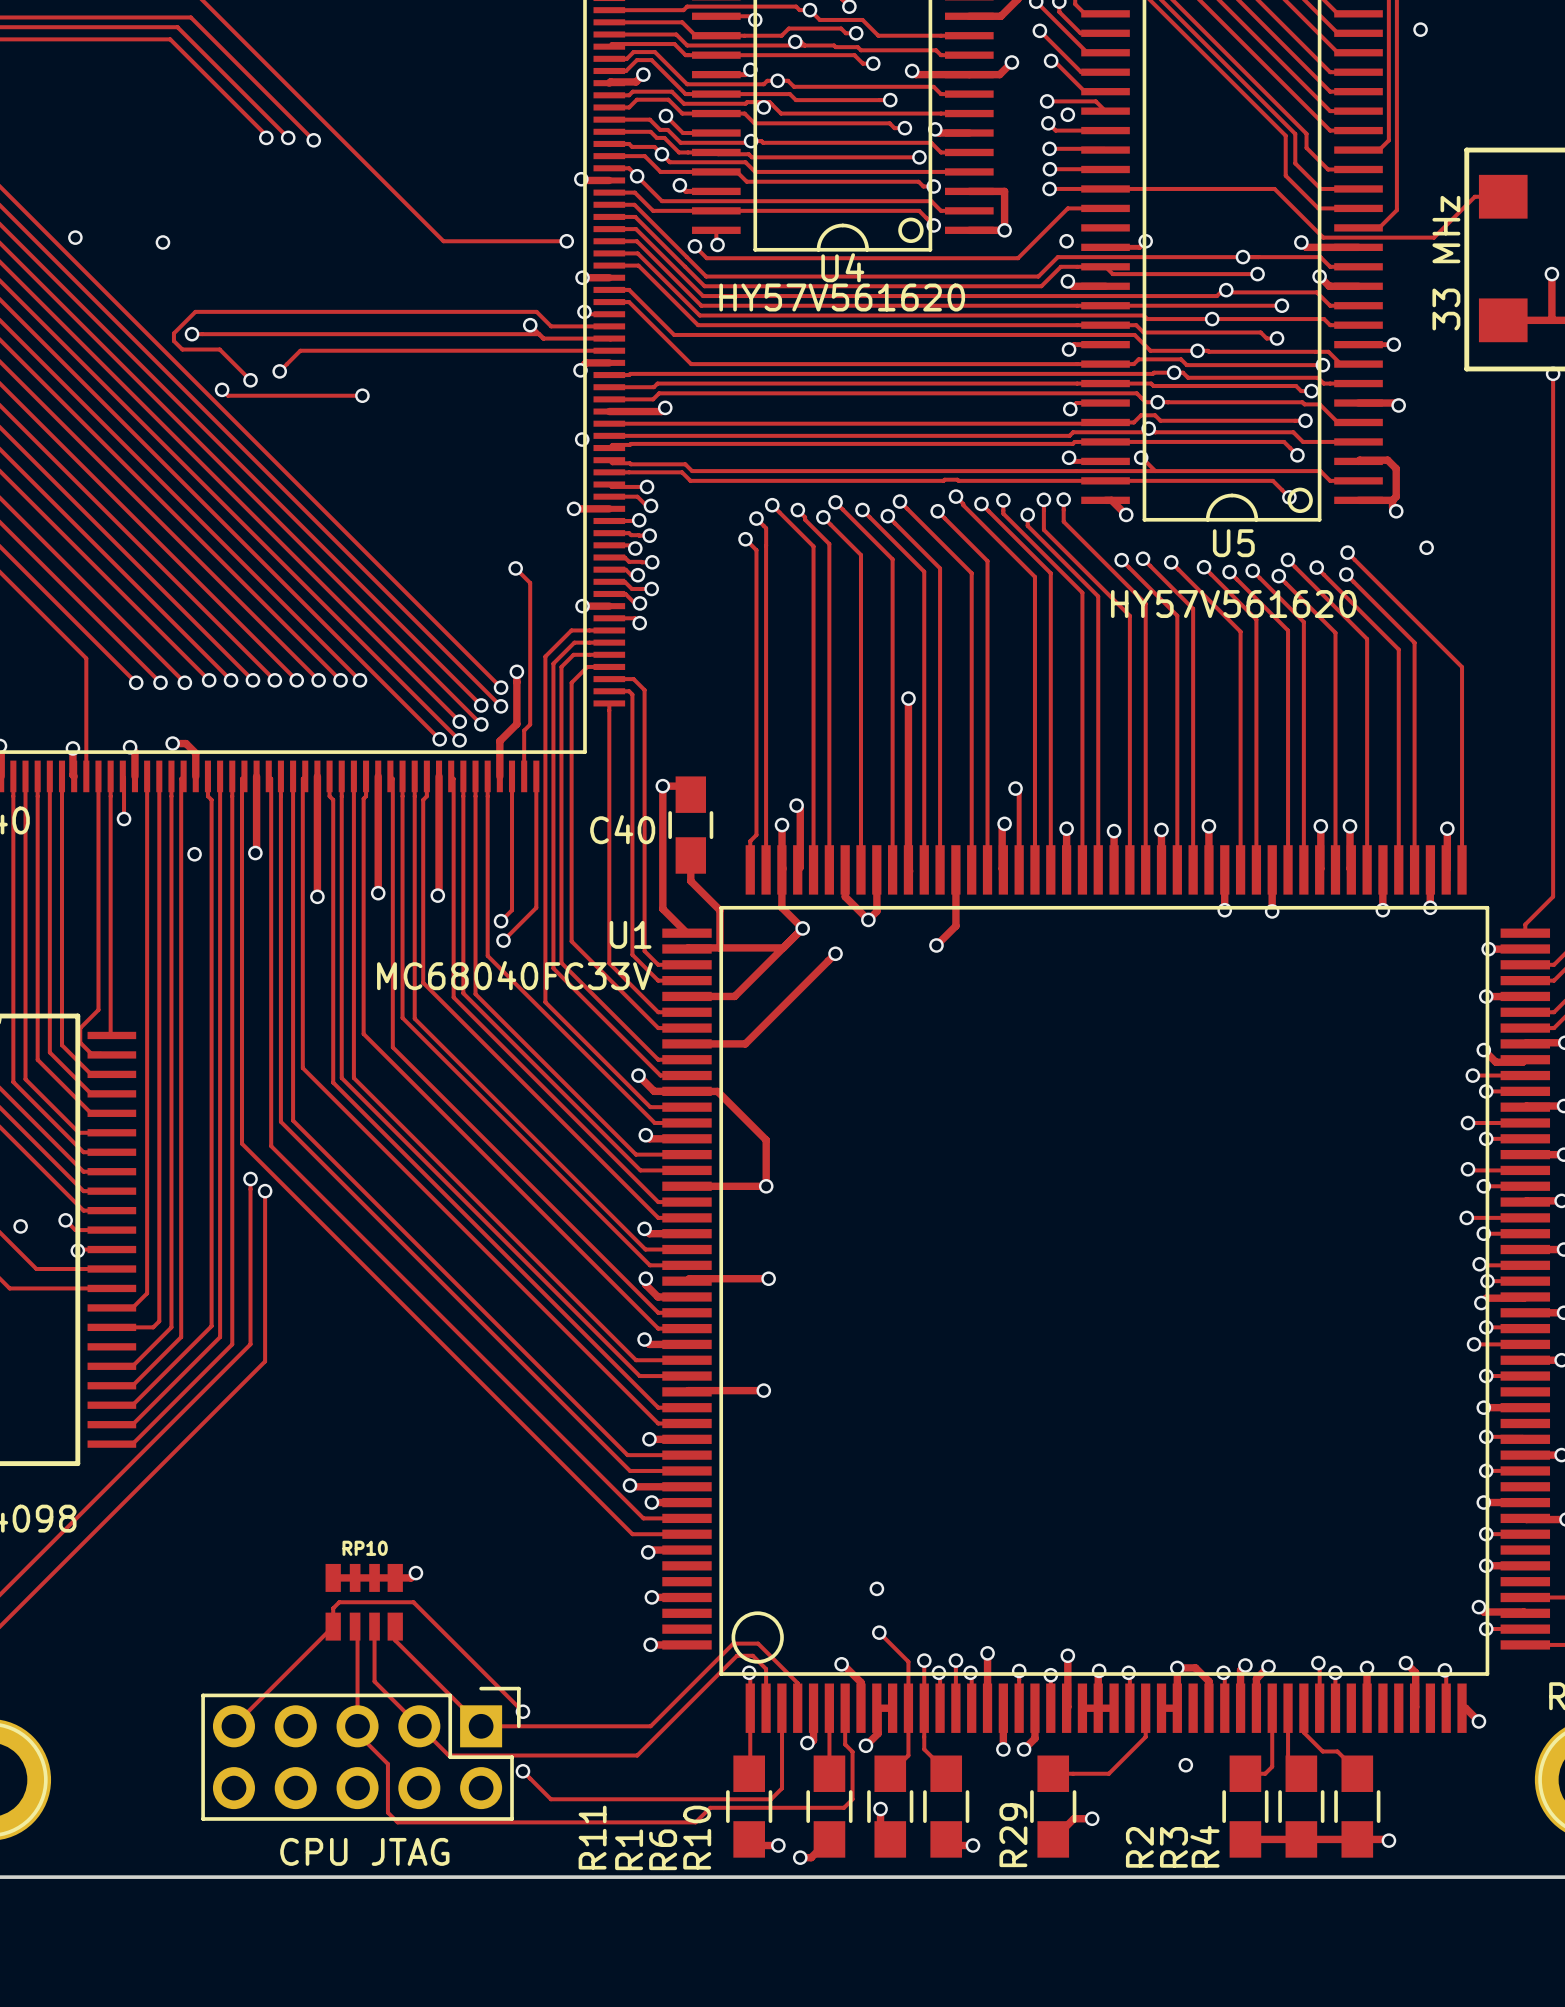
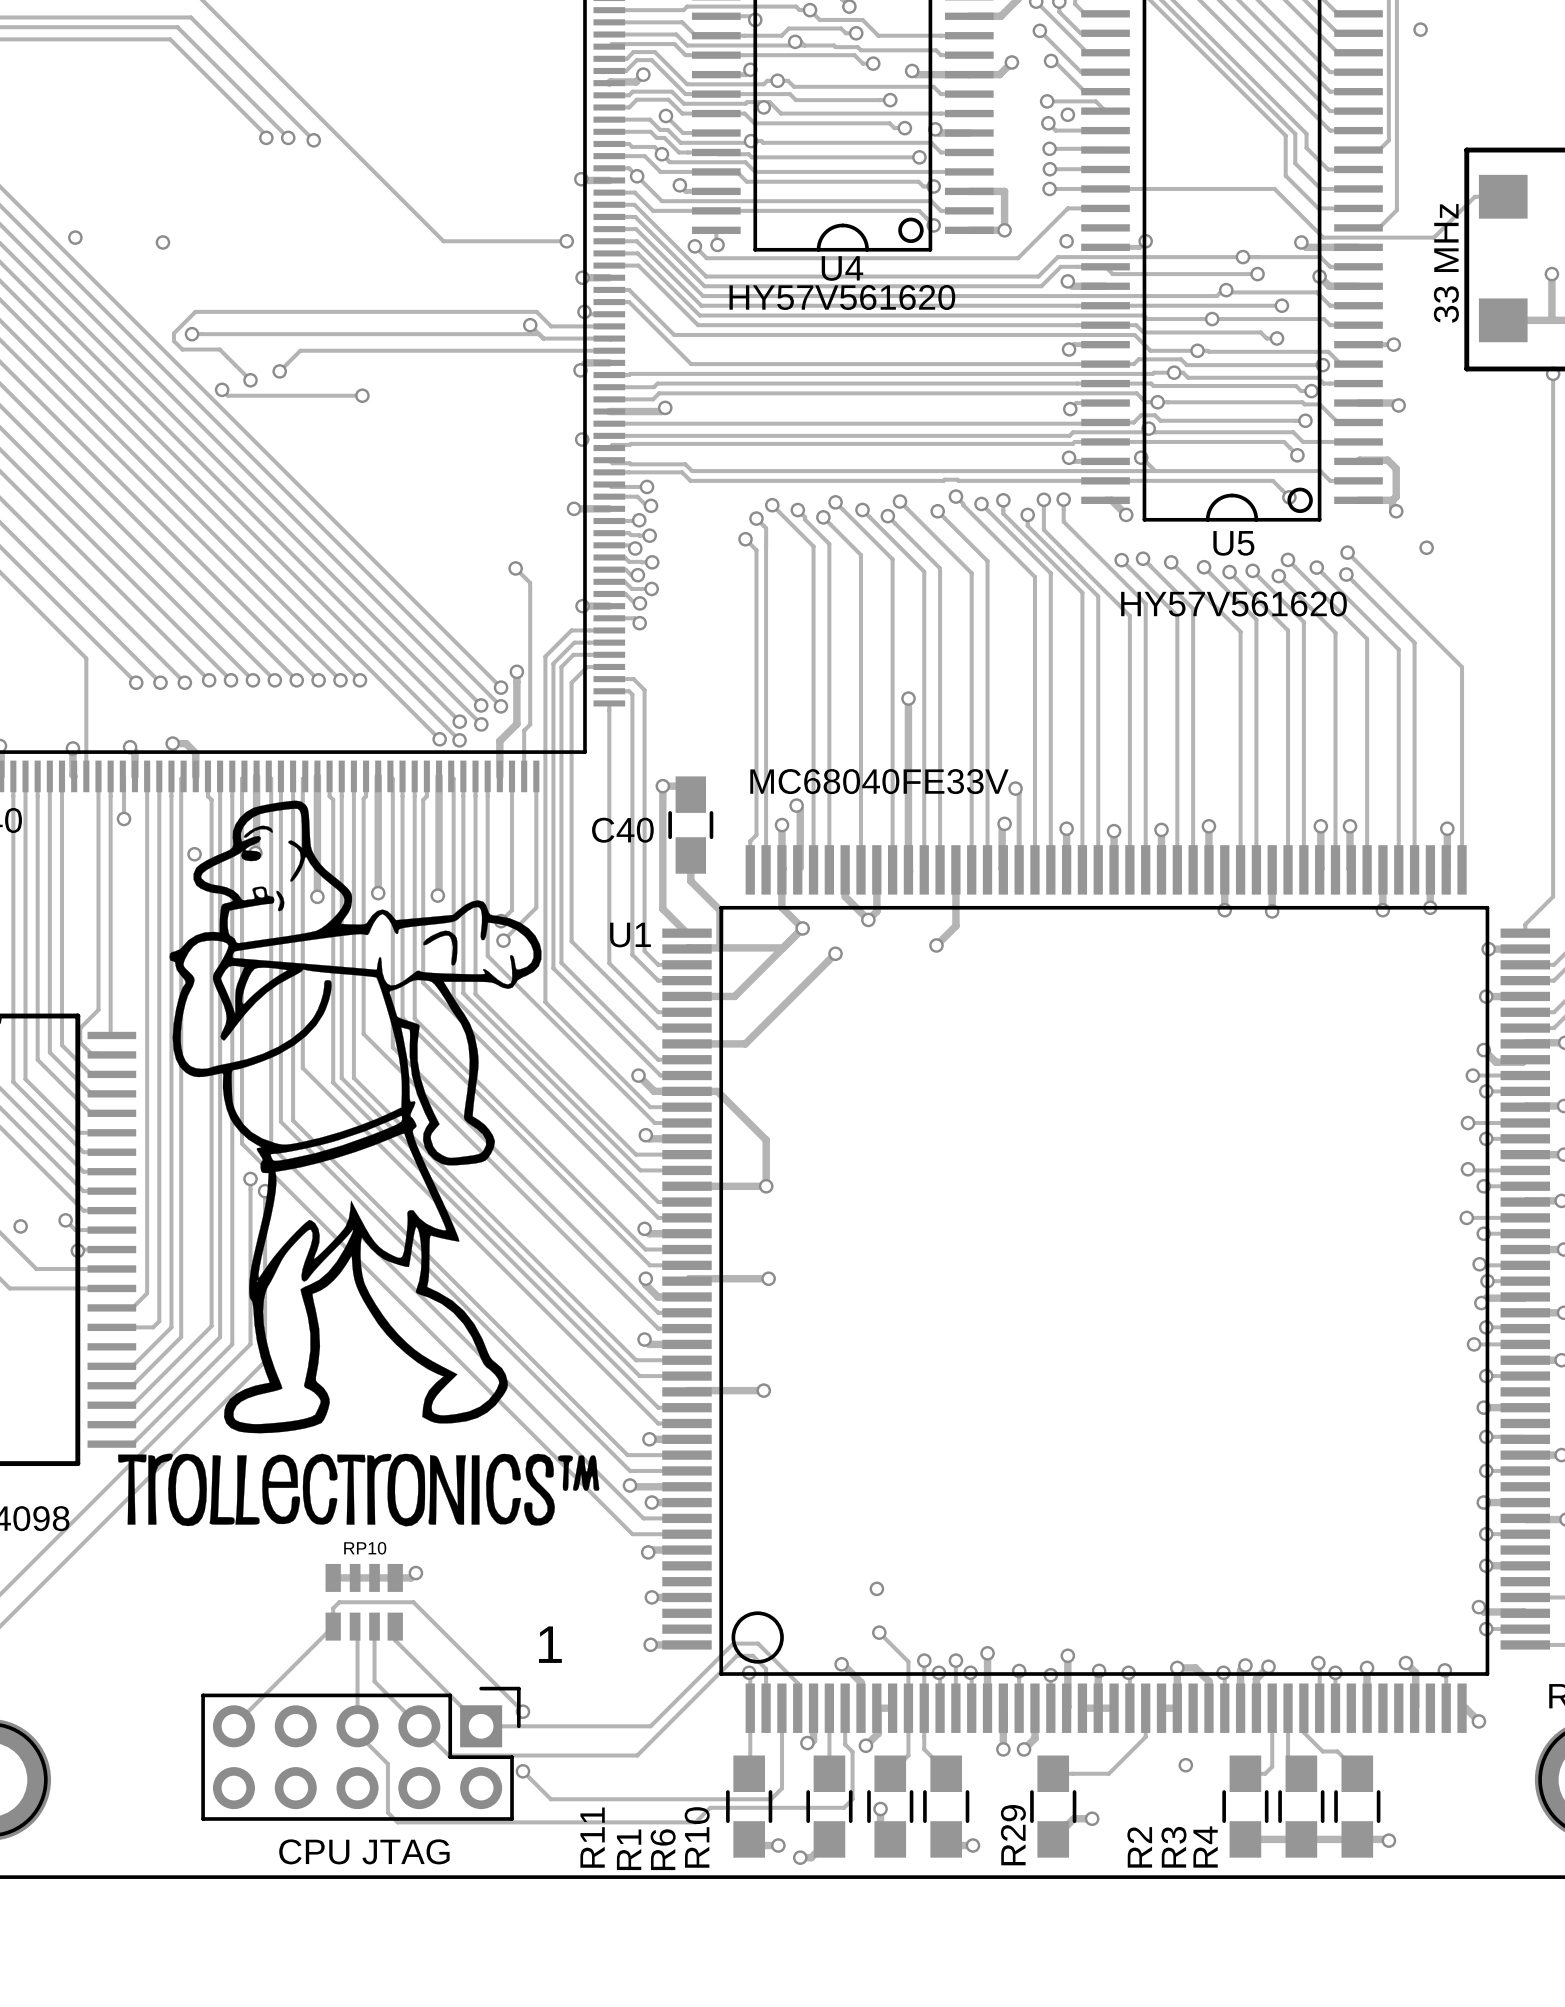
drawing: none -> [118, 800, 600, 1527]
U1 value: MC68040FC33V (514, 975) -> MC68040FE33V (879, 781)
text: none -> 1 (550, 1644)

